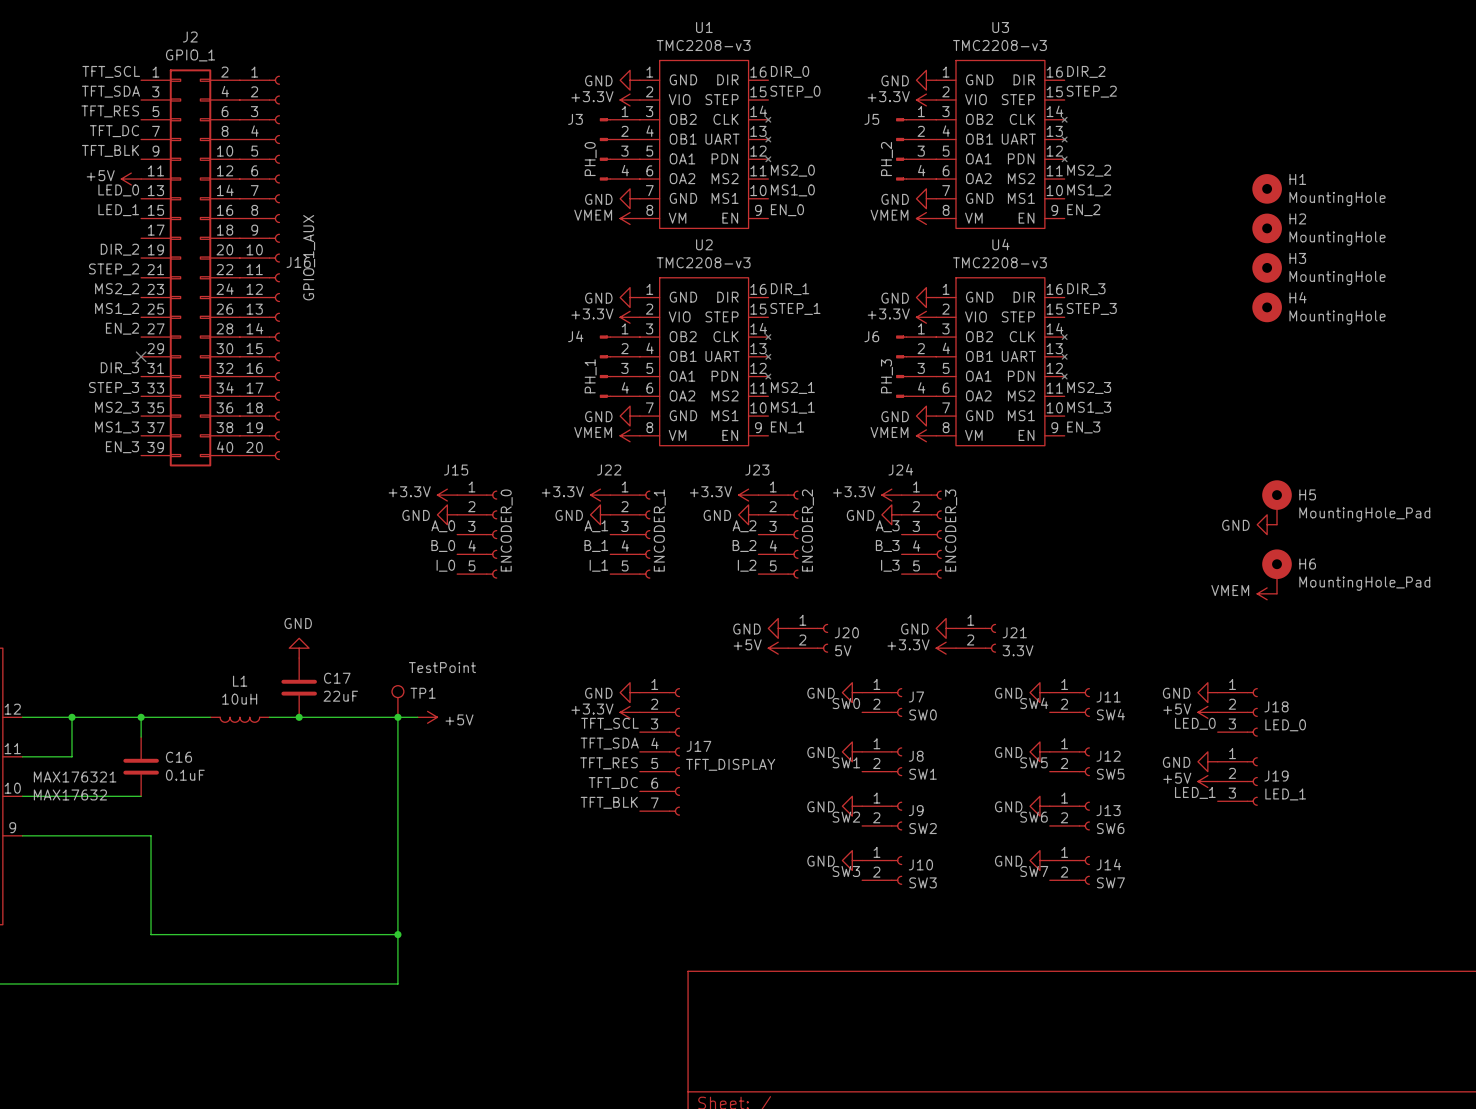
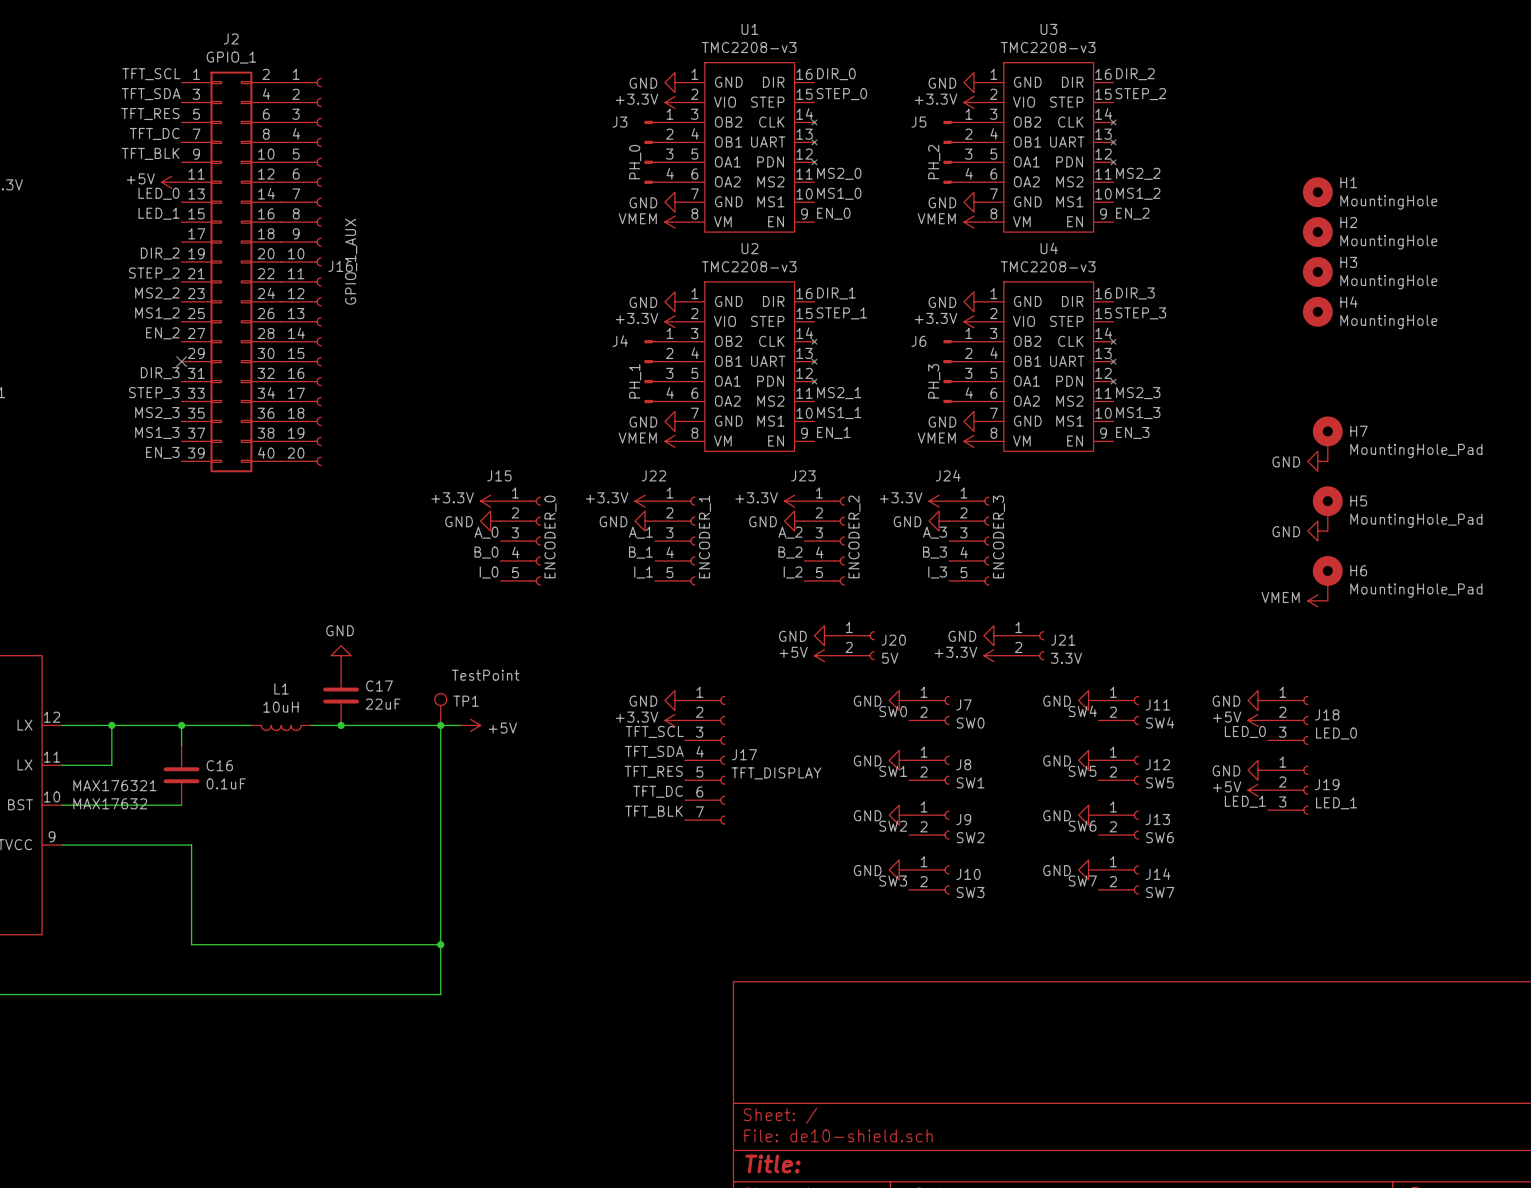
H7: none -> MountingHole_Pad (1327, 438)
power symbol: none -> GND (1317, 461)

